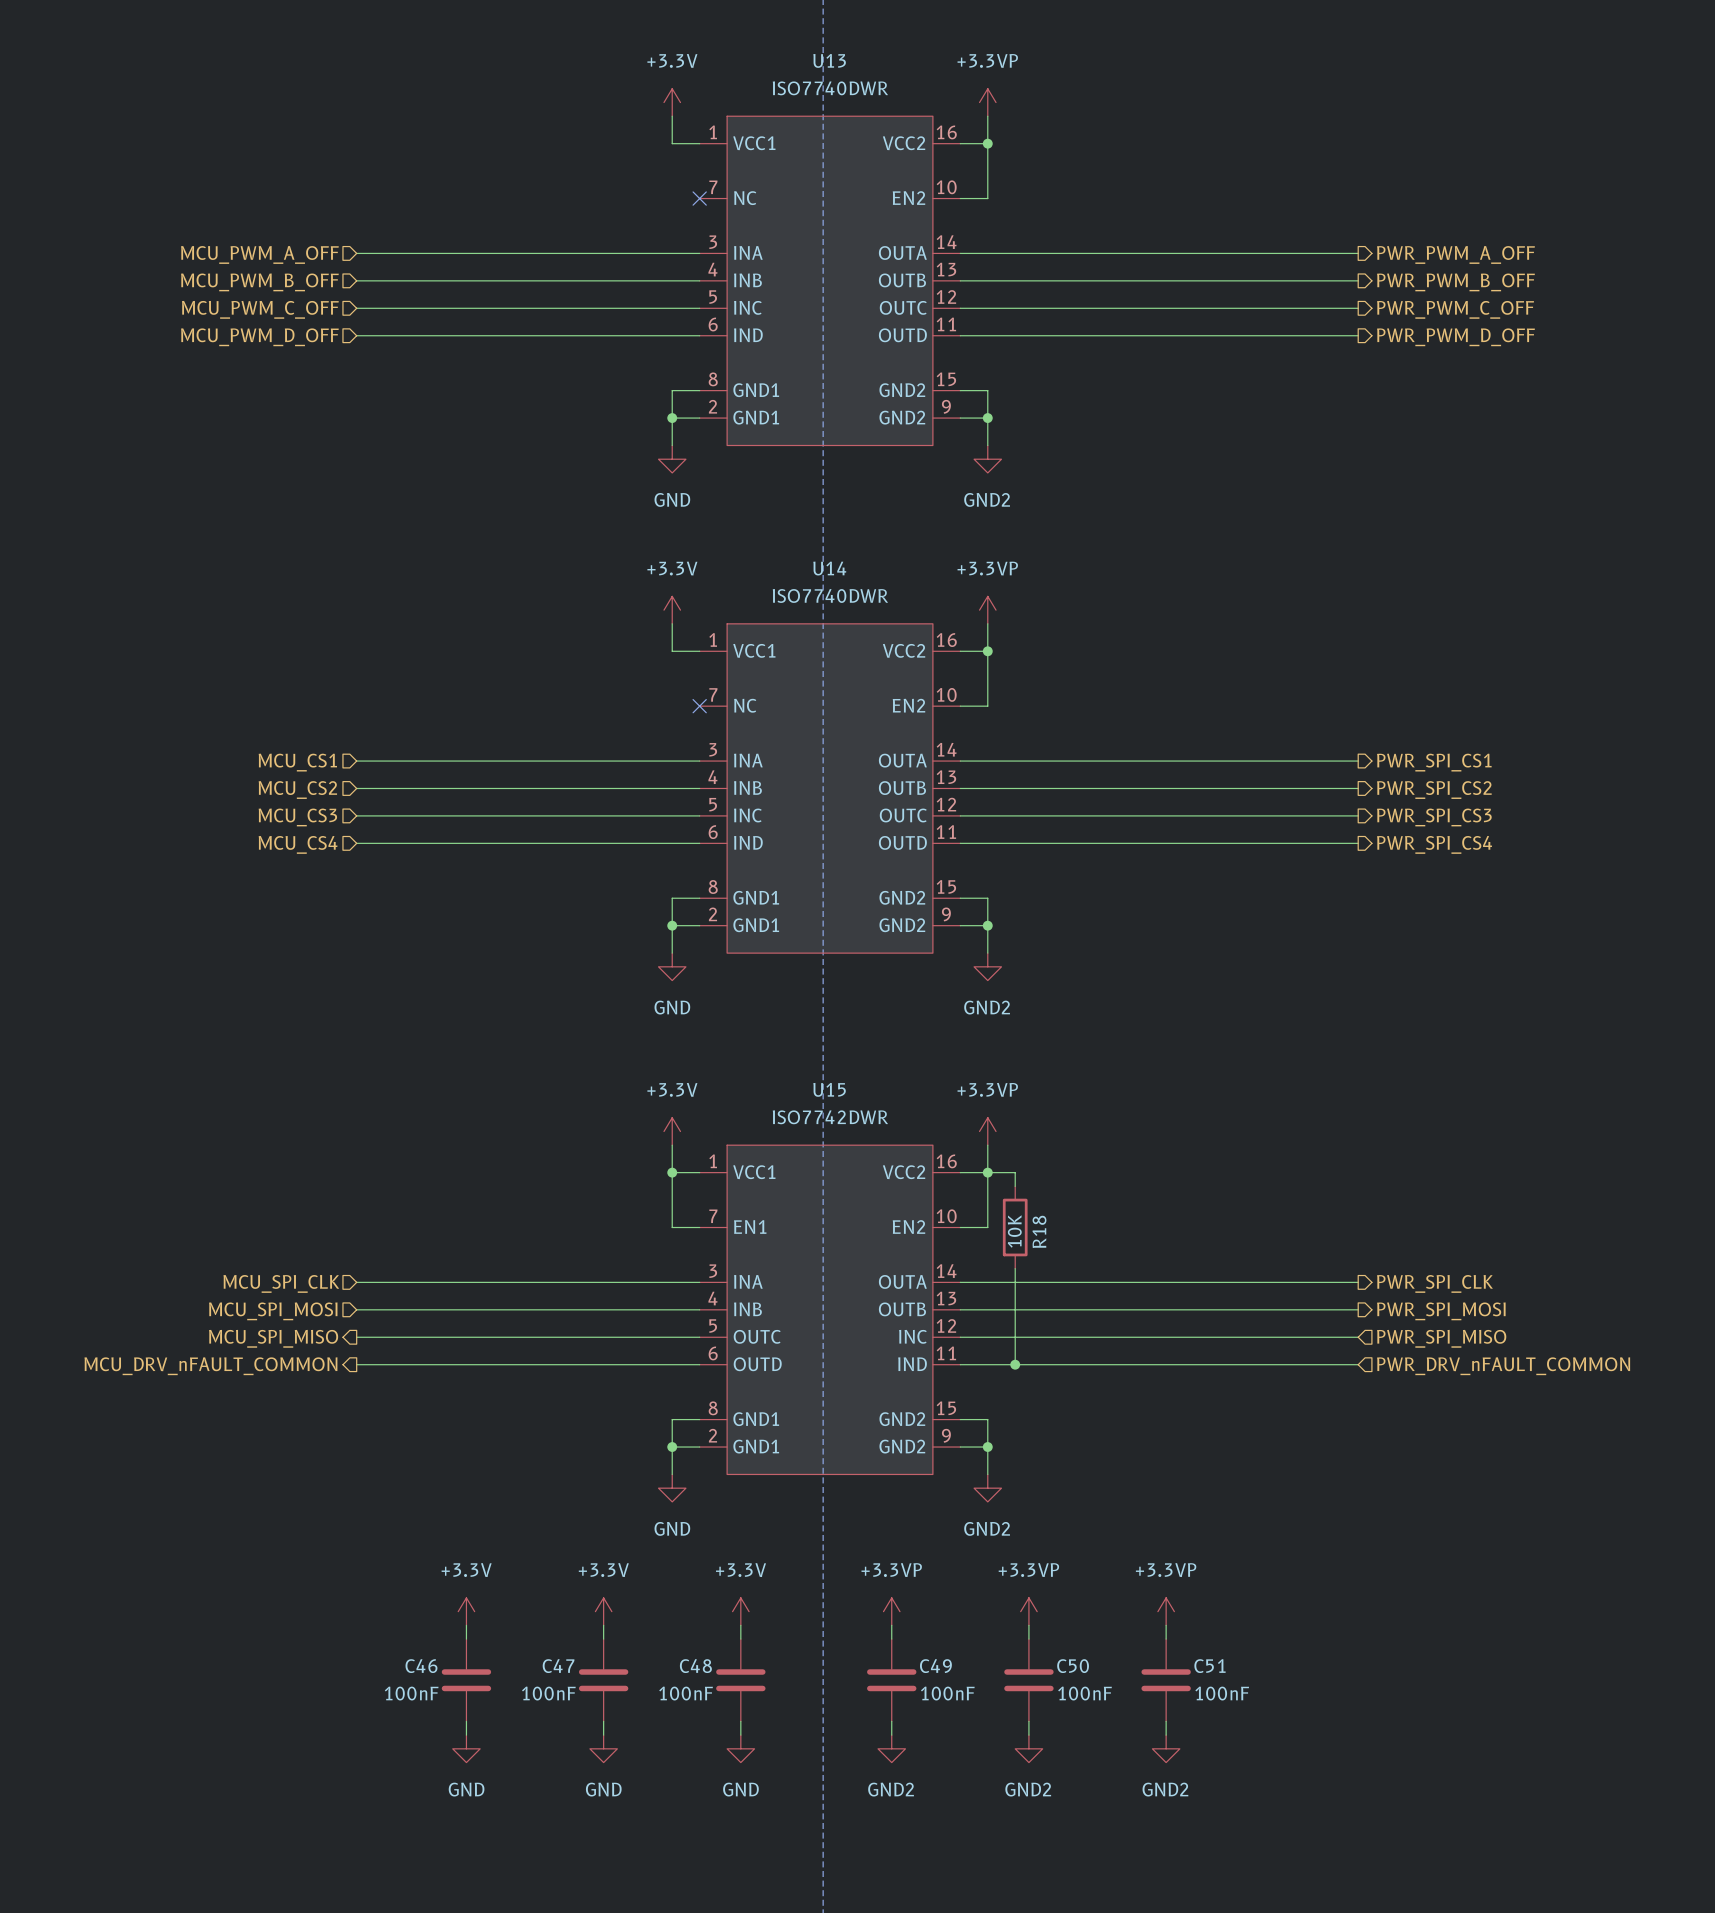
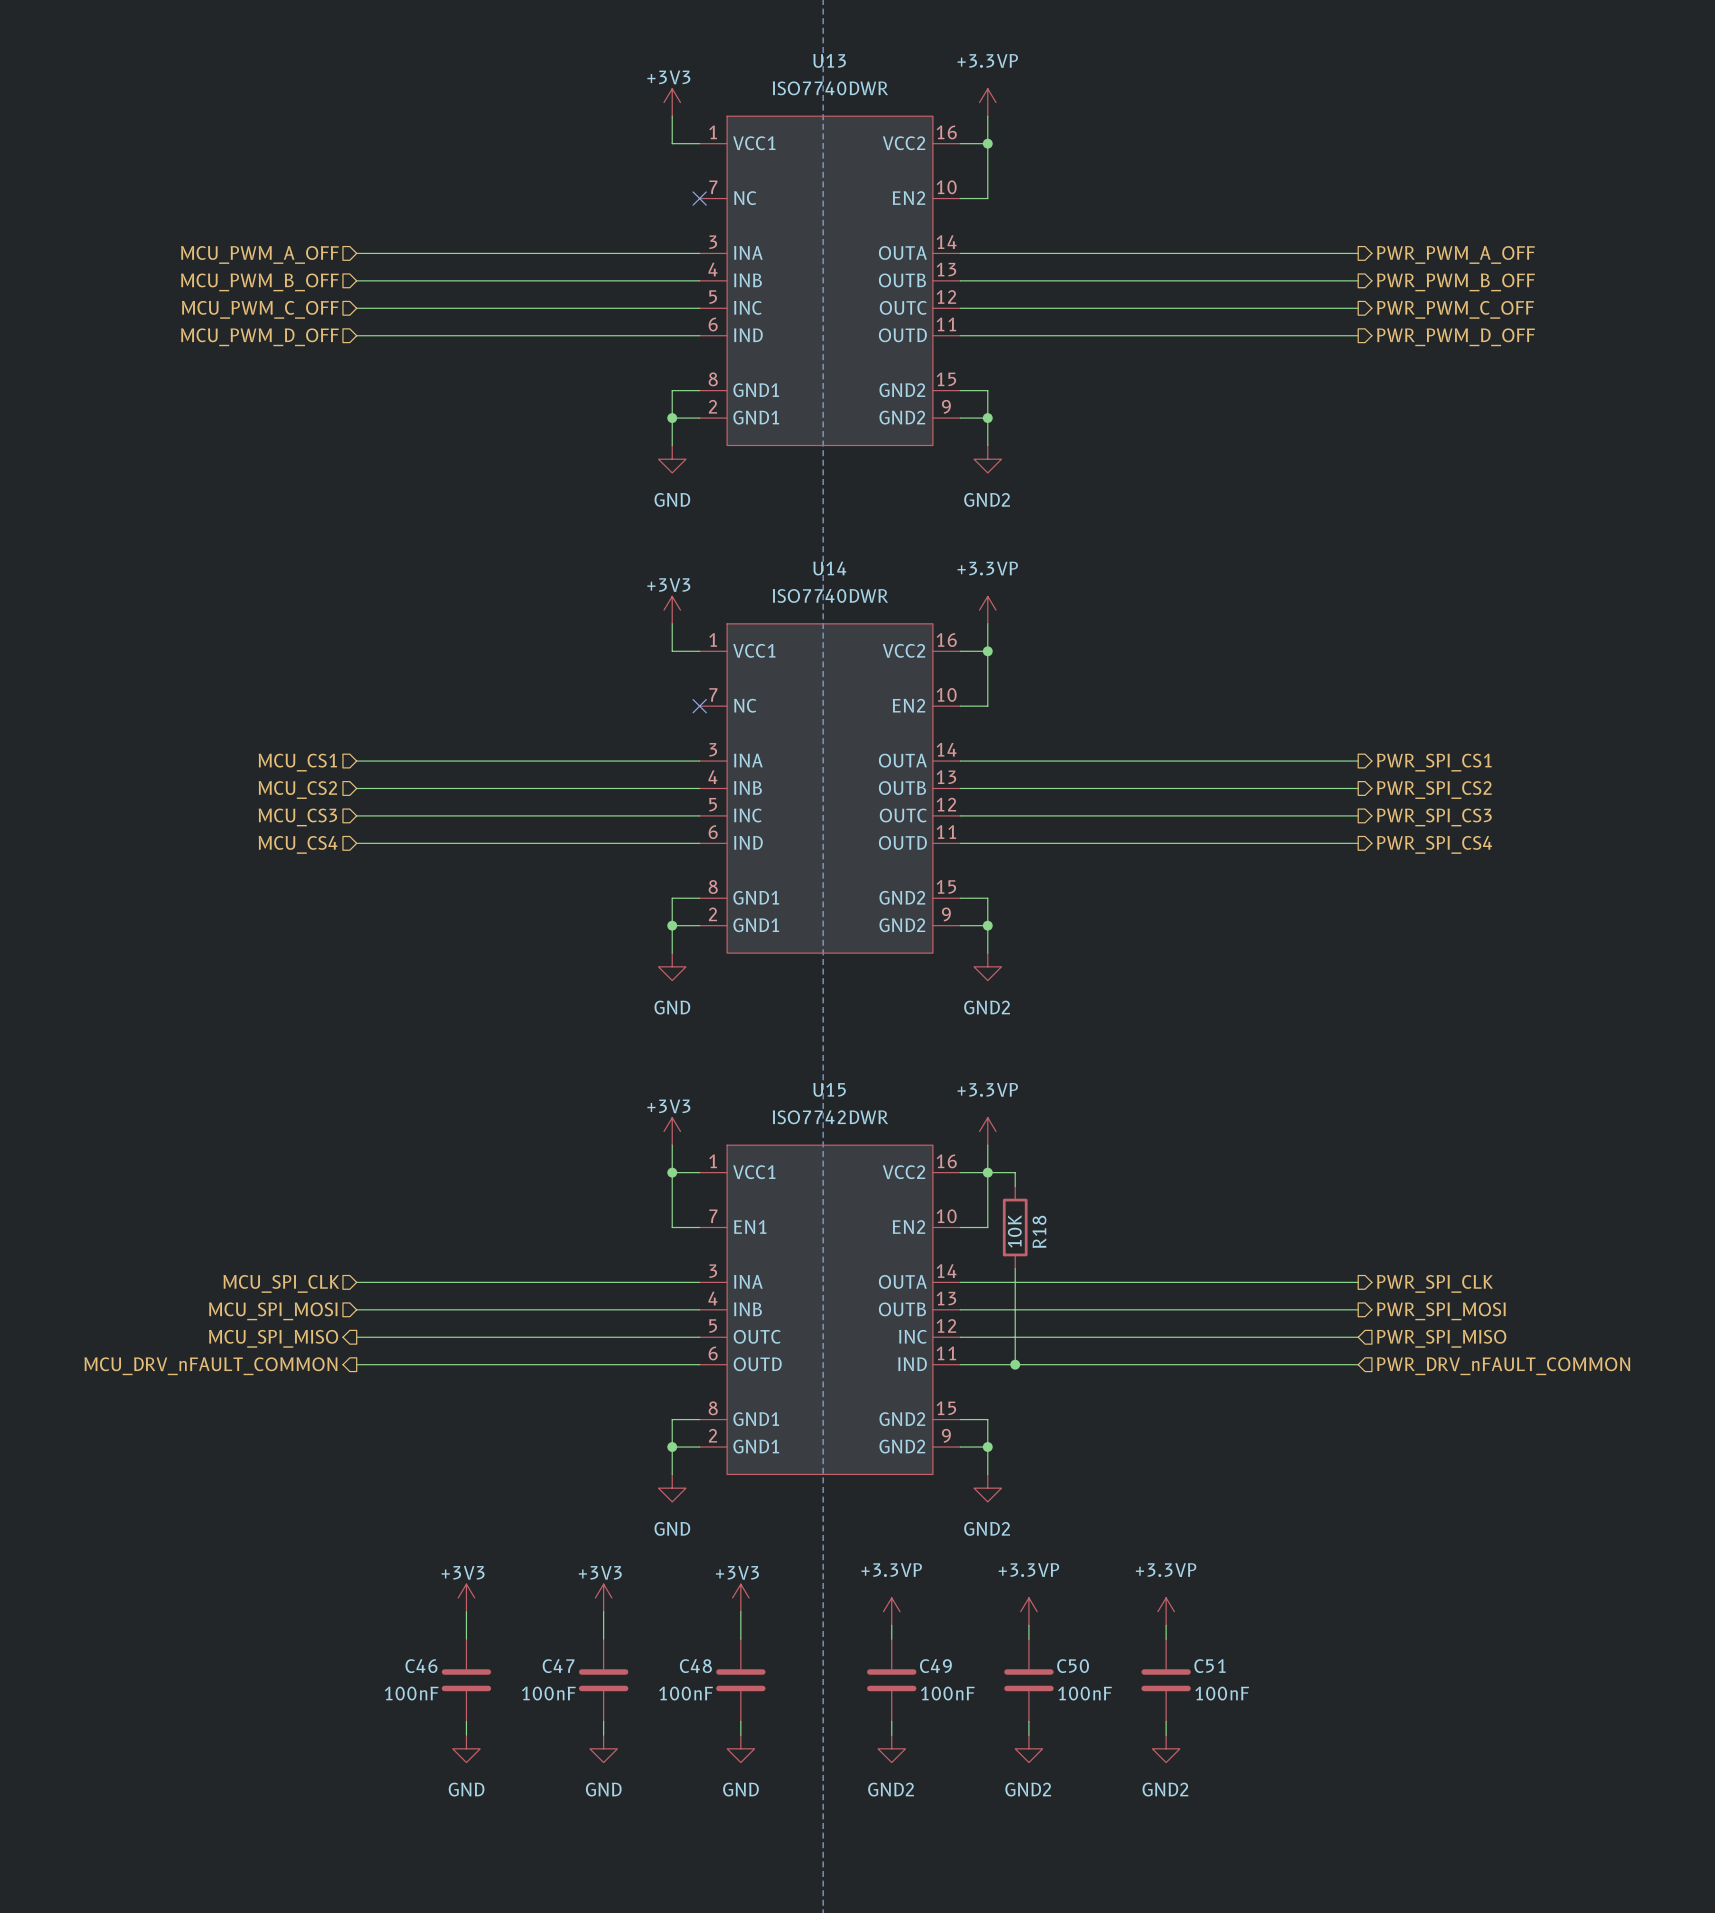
power symbol: +3.3V (672, 102) -> +3V3 (672, 102)
power symbol: +3.3V (672, 610) -> +3V3 (672, 610)
power symbol: +3.3V (672, 1131) -> +3V3 (672, 1131)
power symbol: none -> +3V3 (466, 1597)
power symbol: none -> +3V3 (603, 1597)
power symbol: none -> +3V3 (740, 1597)
power symbol: +3.3V (466, 1611) -> none
power symbol: +3.3V (603, 1611) -> none
power symbol: +3.3V (740, 1611) -> none

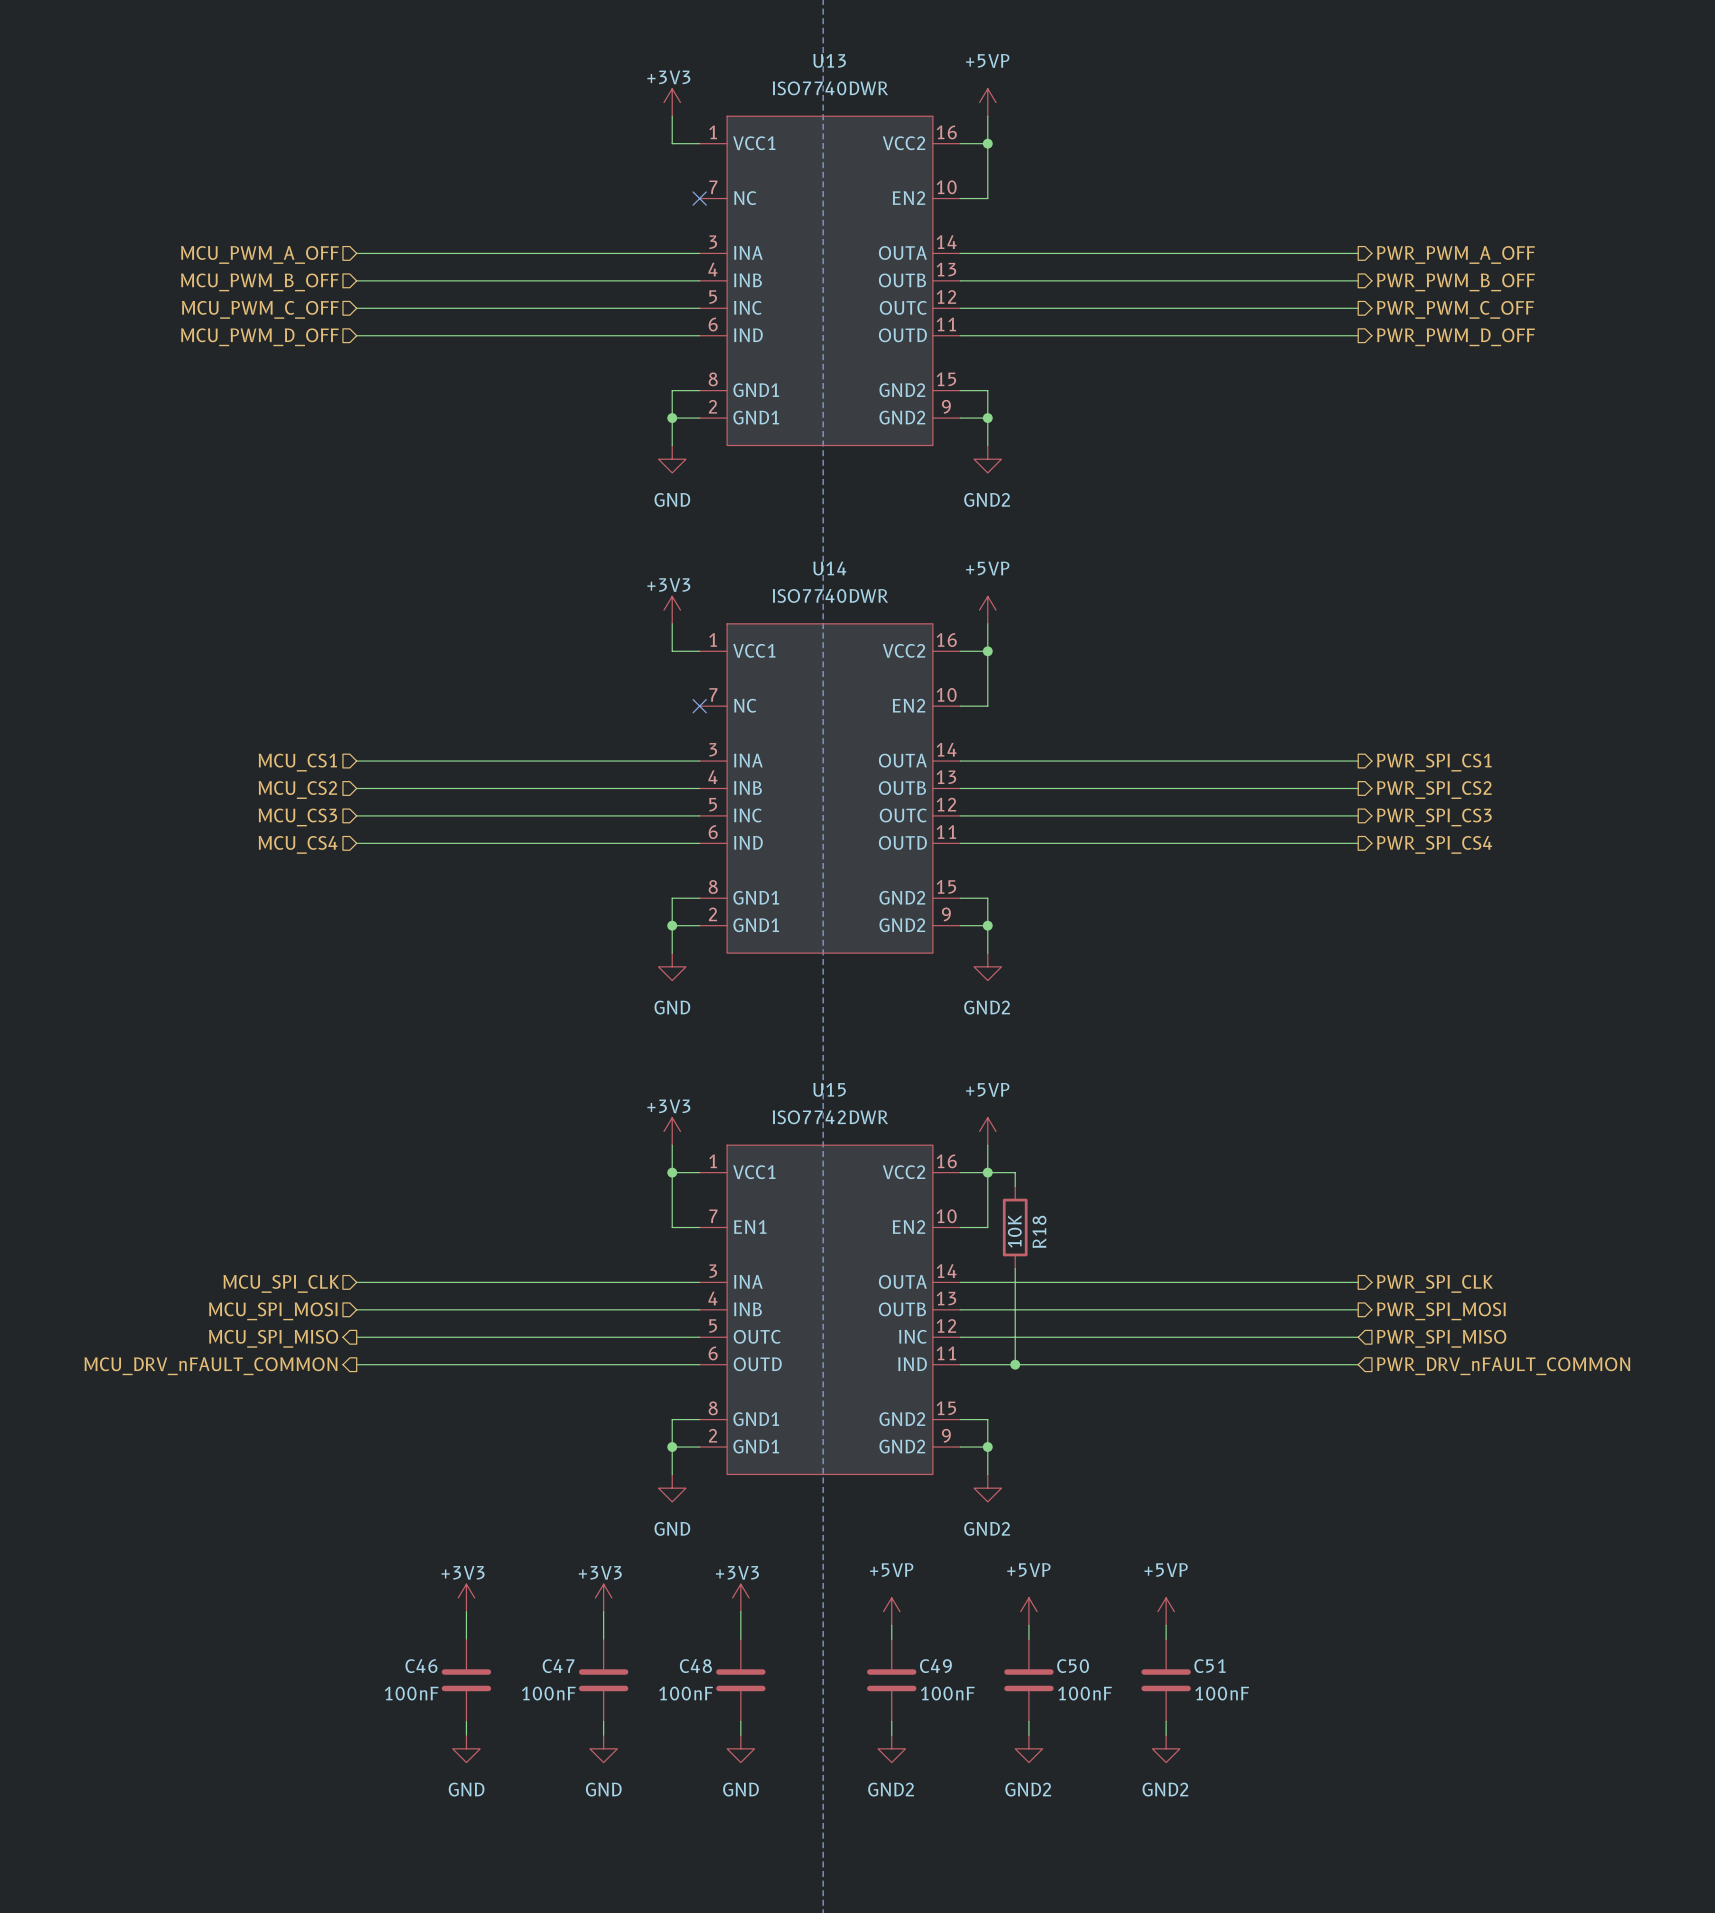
power symbol: +3.3VP (987, 102) -> +5VP (987, 102)
power symbol: +3.3VP (987, 610) -> +5VP (987, 610)
power symbol: +3.3VP (987, 1131) -> +5VP (987, 1131)
power symbol: +3.3VP (891, 1611) -> +5VP (891, 1611)
power symbol: +3.3VP (1028, 1611) -> +5VP (1028, 1611)
power symbol: +3.3VP (1166, 1611) -> +5VP (1166, 1611)

